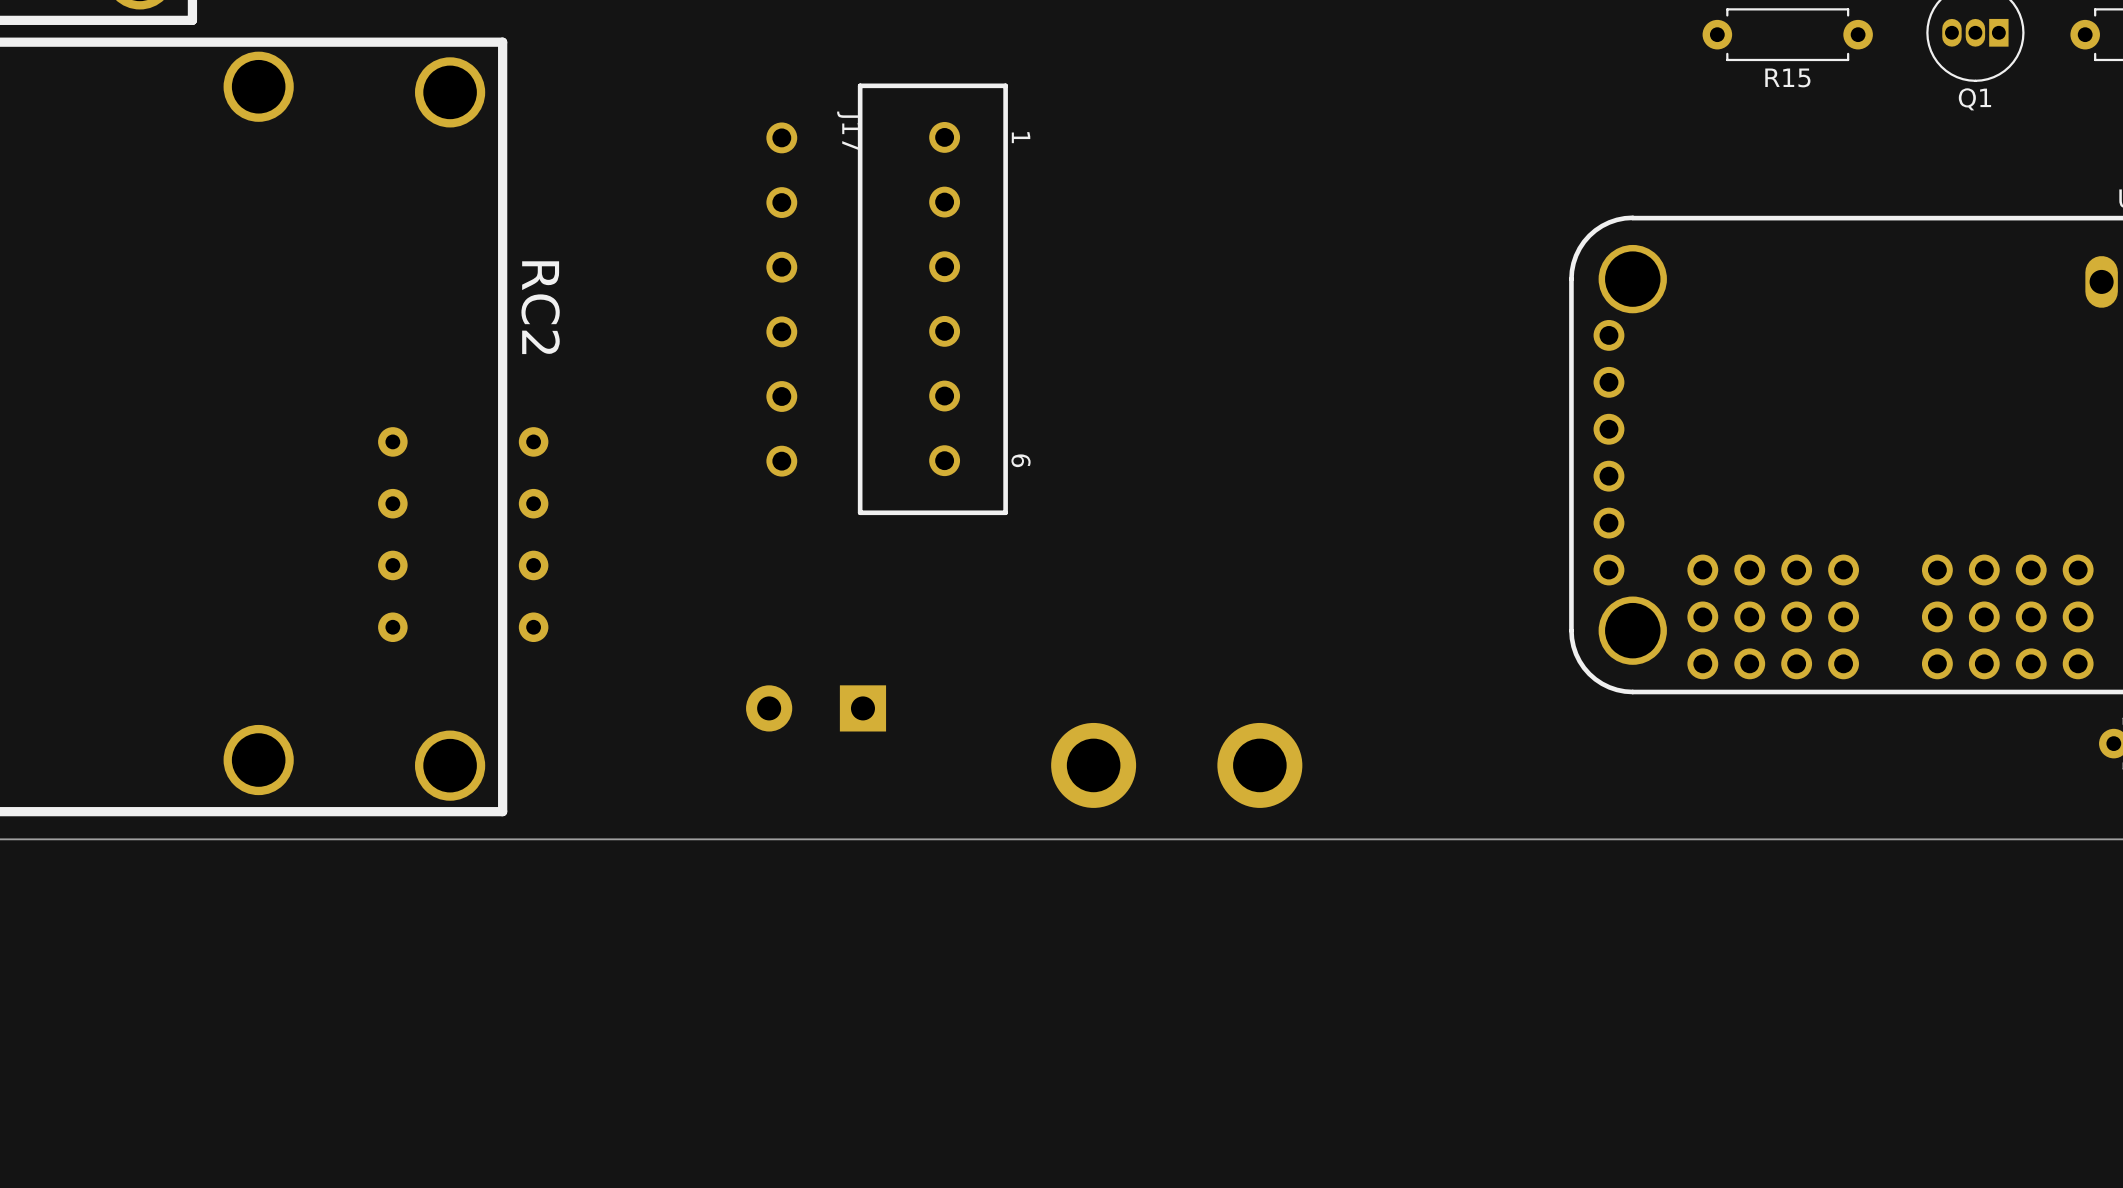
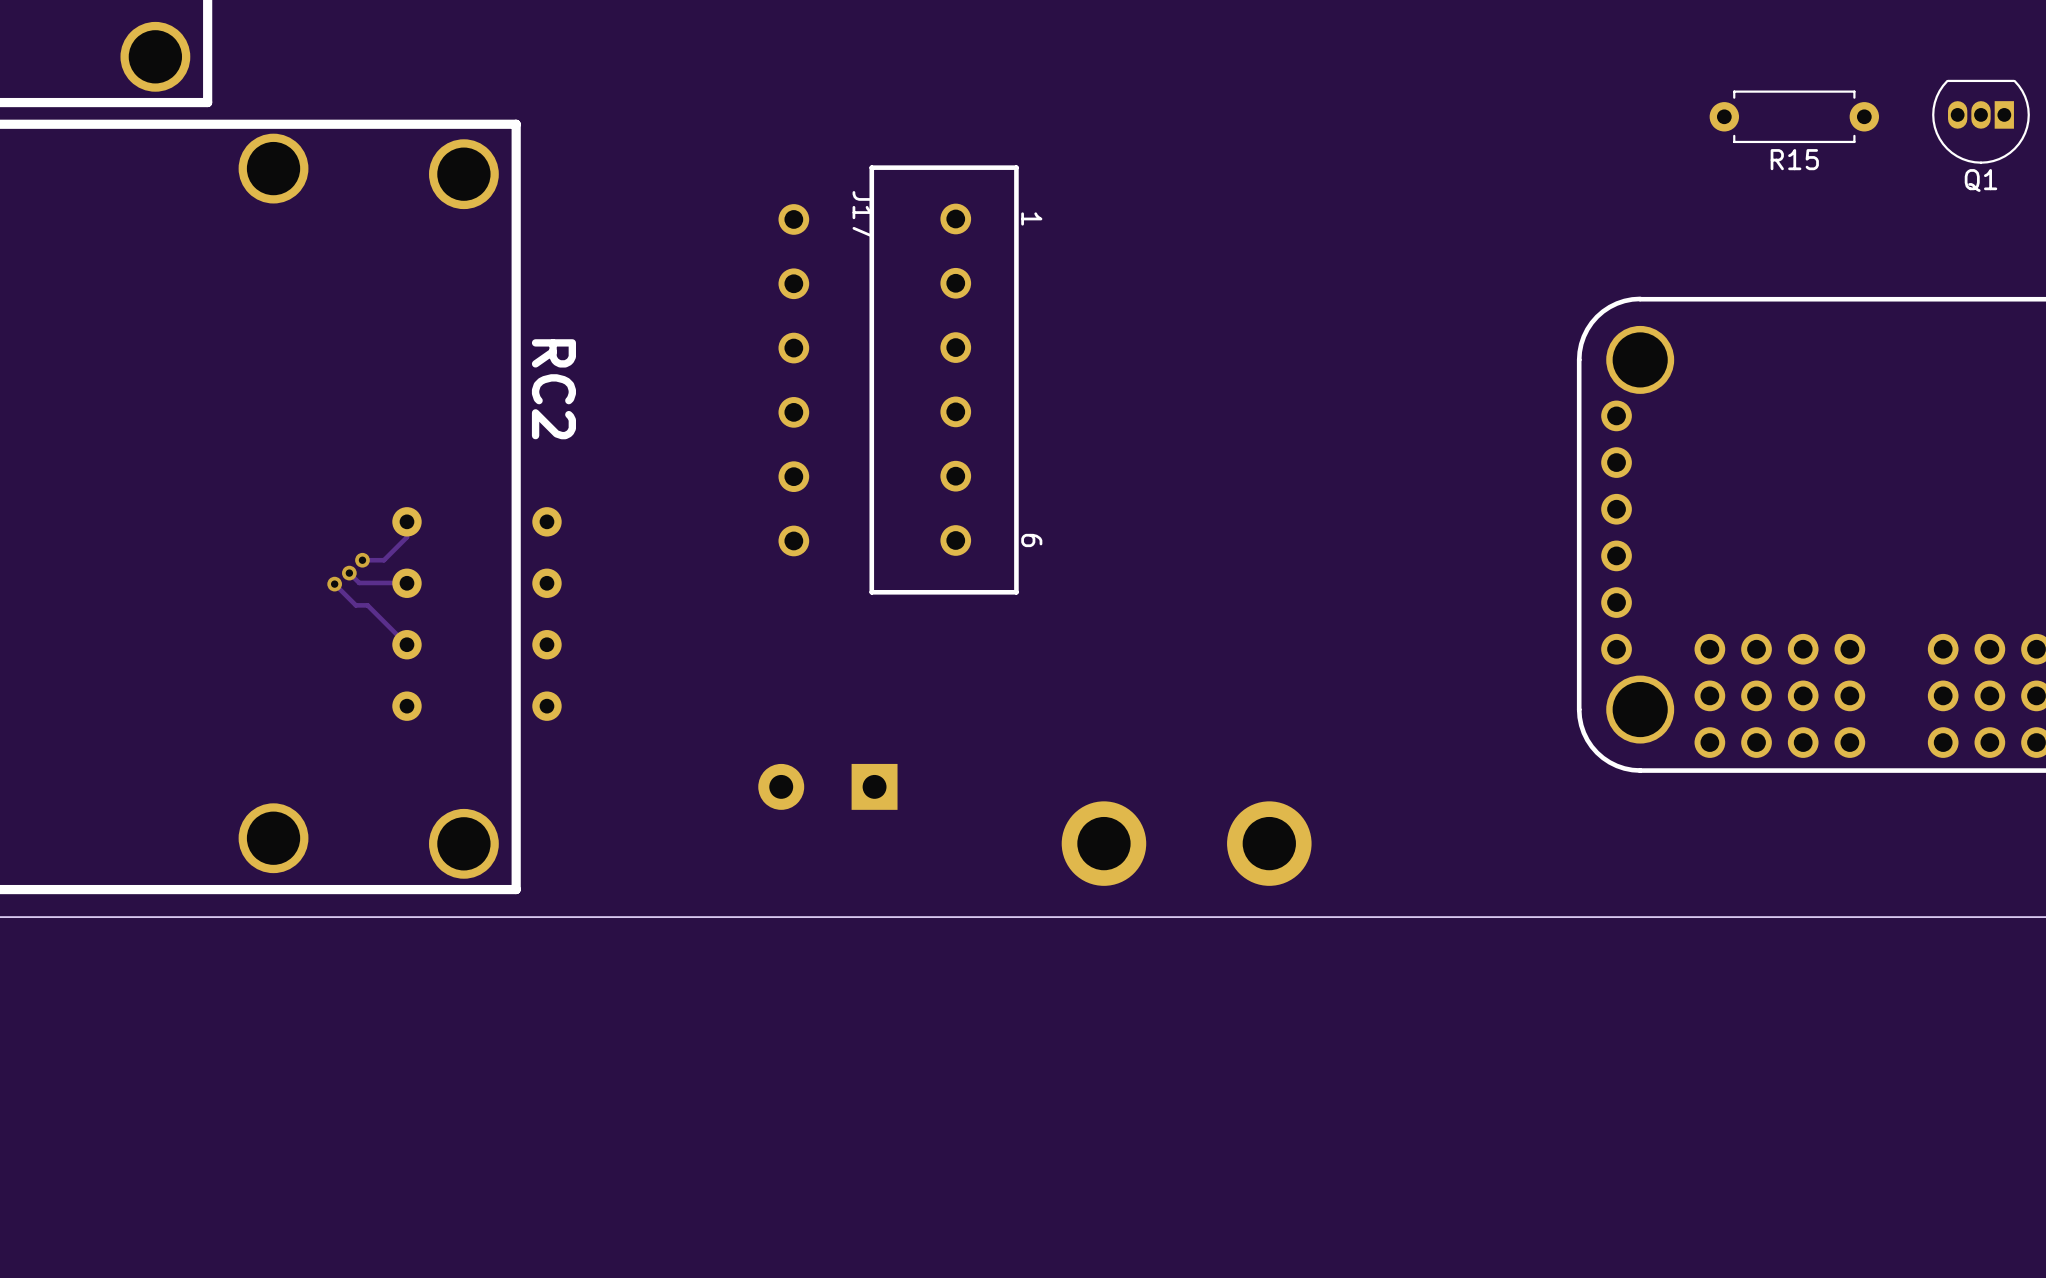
track: none -> (406, 521) (406, 537) (383, 560) (362, 560)
via: none -> (362, 560)
track: none -> (349, 573) (359, 582) (406, 582)
via: none -> (349, 573)
track: none -> (334, 584) (355, 605) (367, 605) (406, 644)
via: none -> (334, 584)

